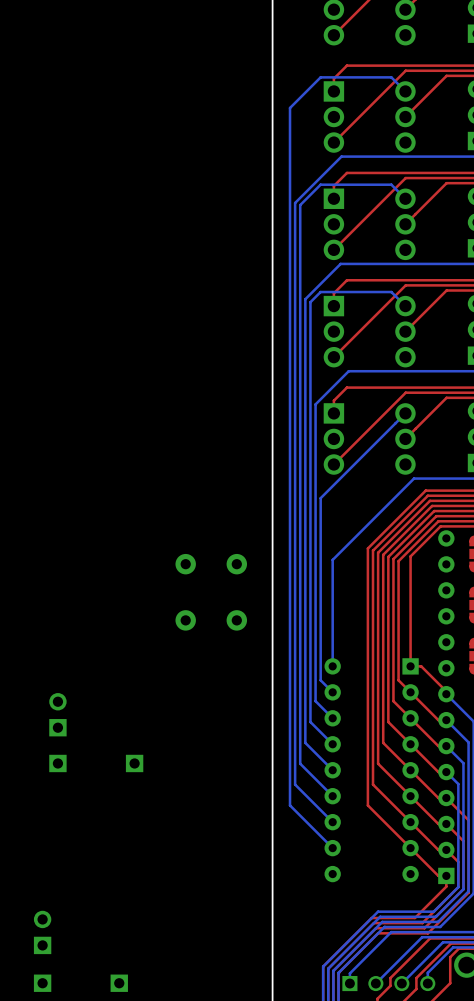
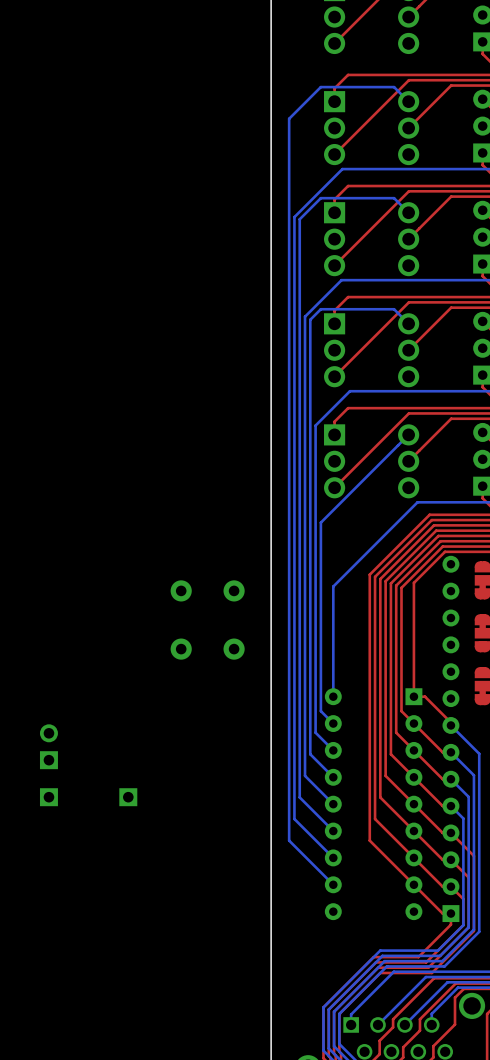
part: (42, 932) -> none
part: (42, 983) -> none
part: (119, 983) -> none

